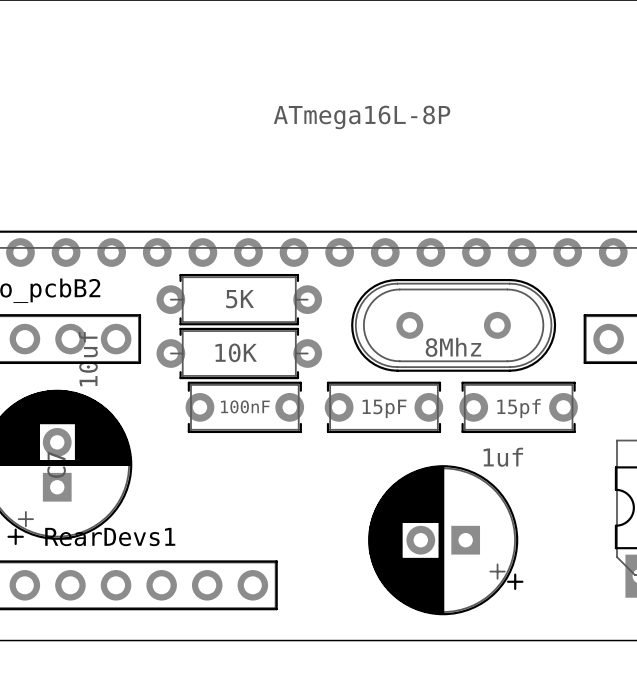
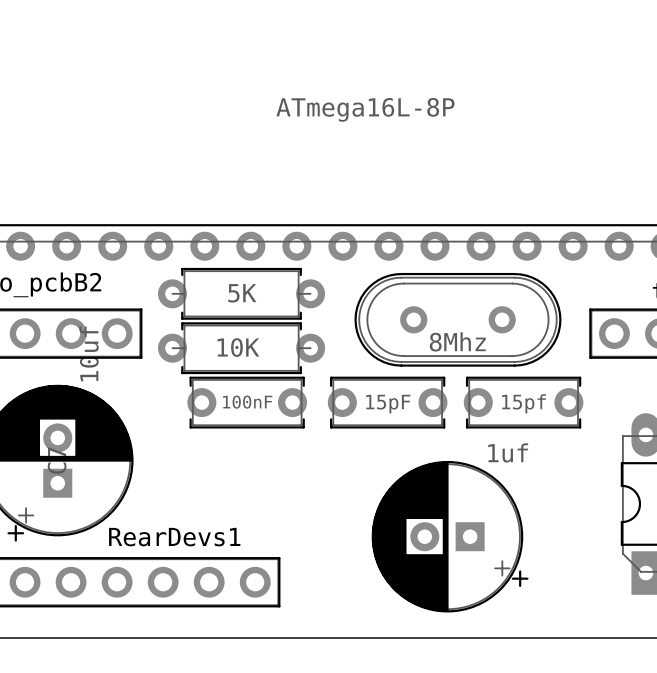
RearDevs1 name position: RearDevs1 (110, 537) -> RearDevs1 (174, 537)

